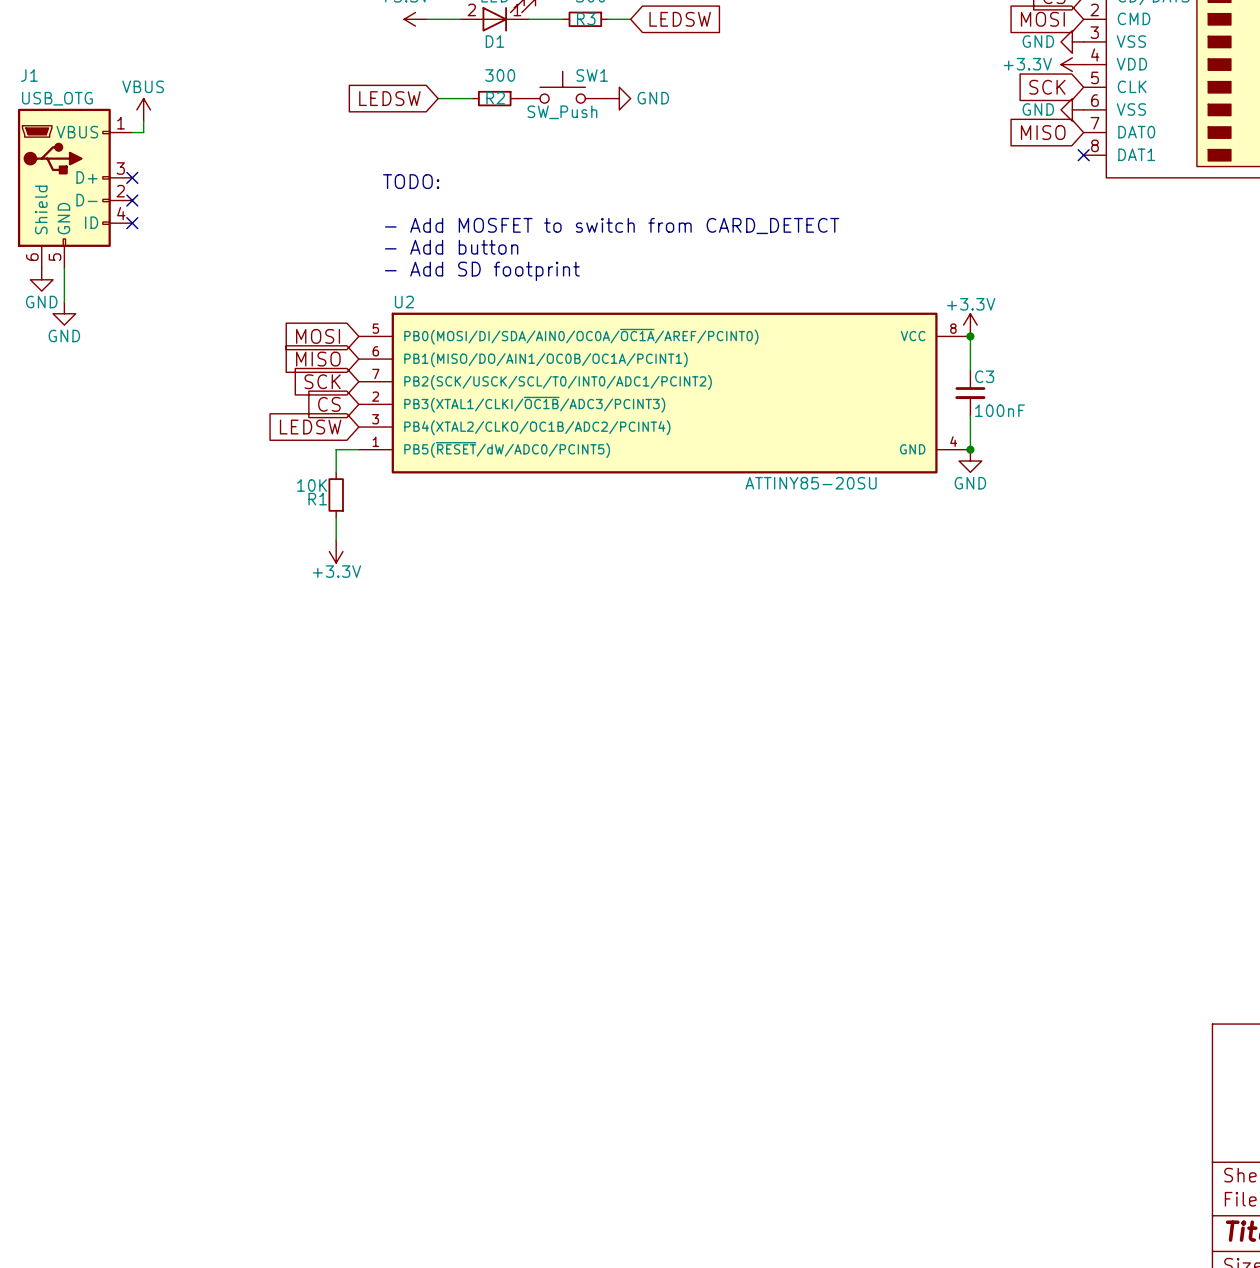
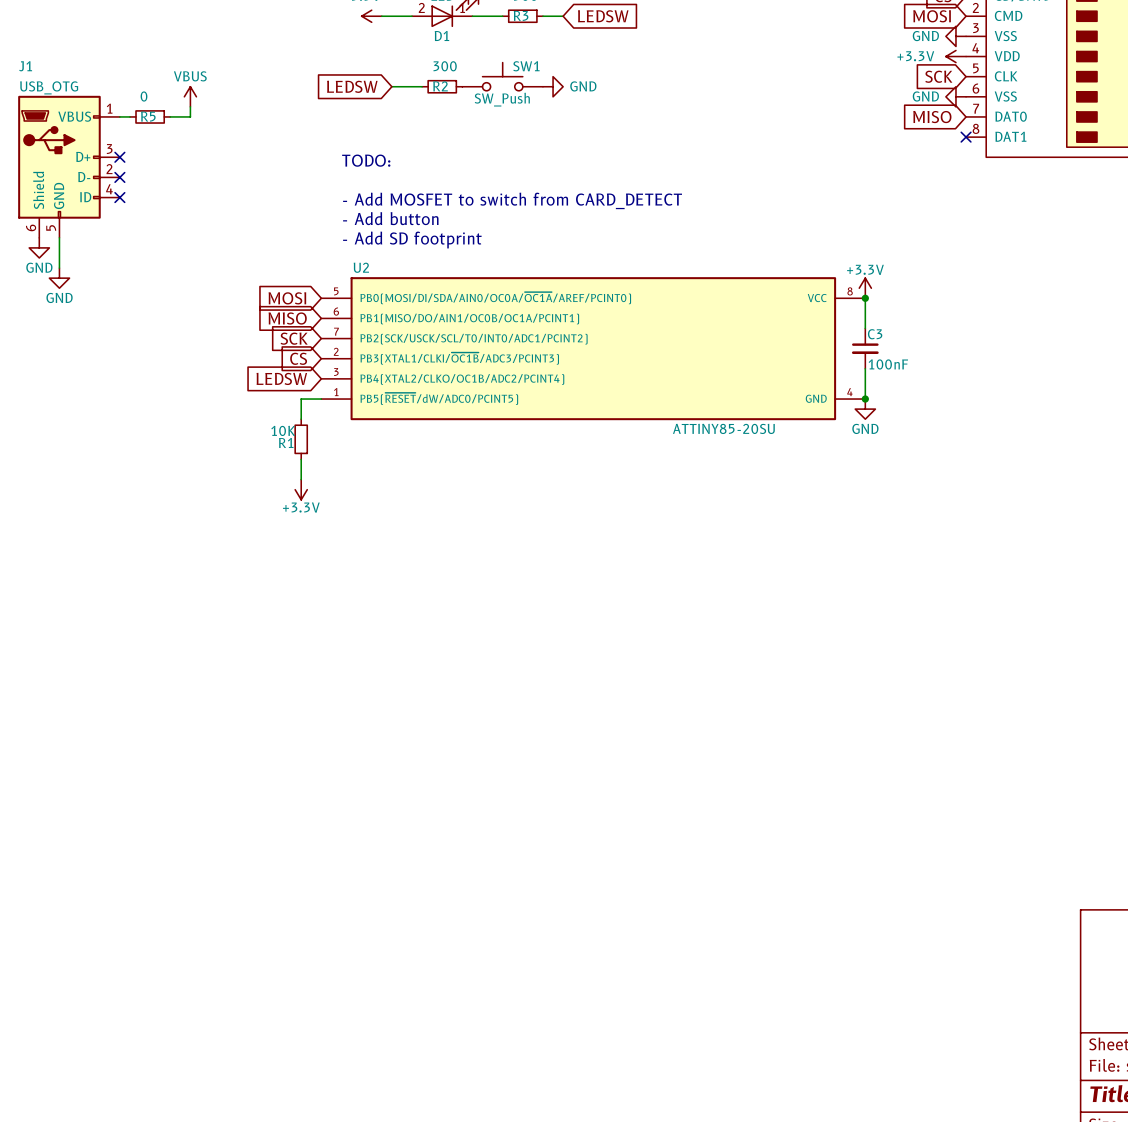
power symbol position: VBUS (143, 109) -> VBUS (190, 96)
wire: (143, 121) (143, 132) -> none
wire: none -> (190, 106) (190, 116) (170, 116)
R5: none -> 0 (150, 116)

